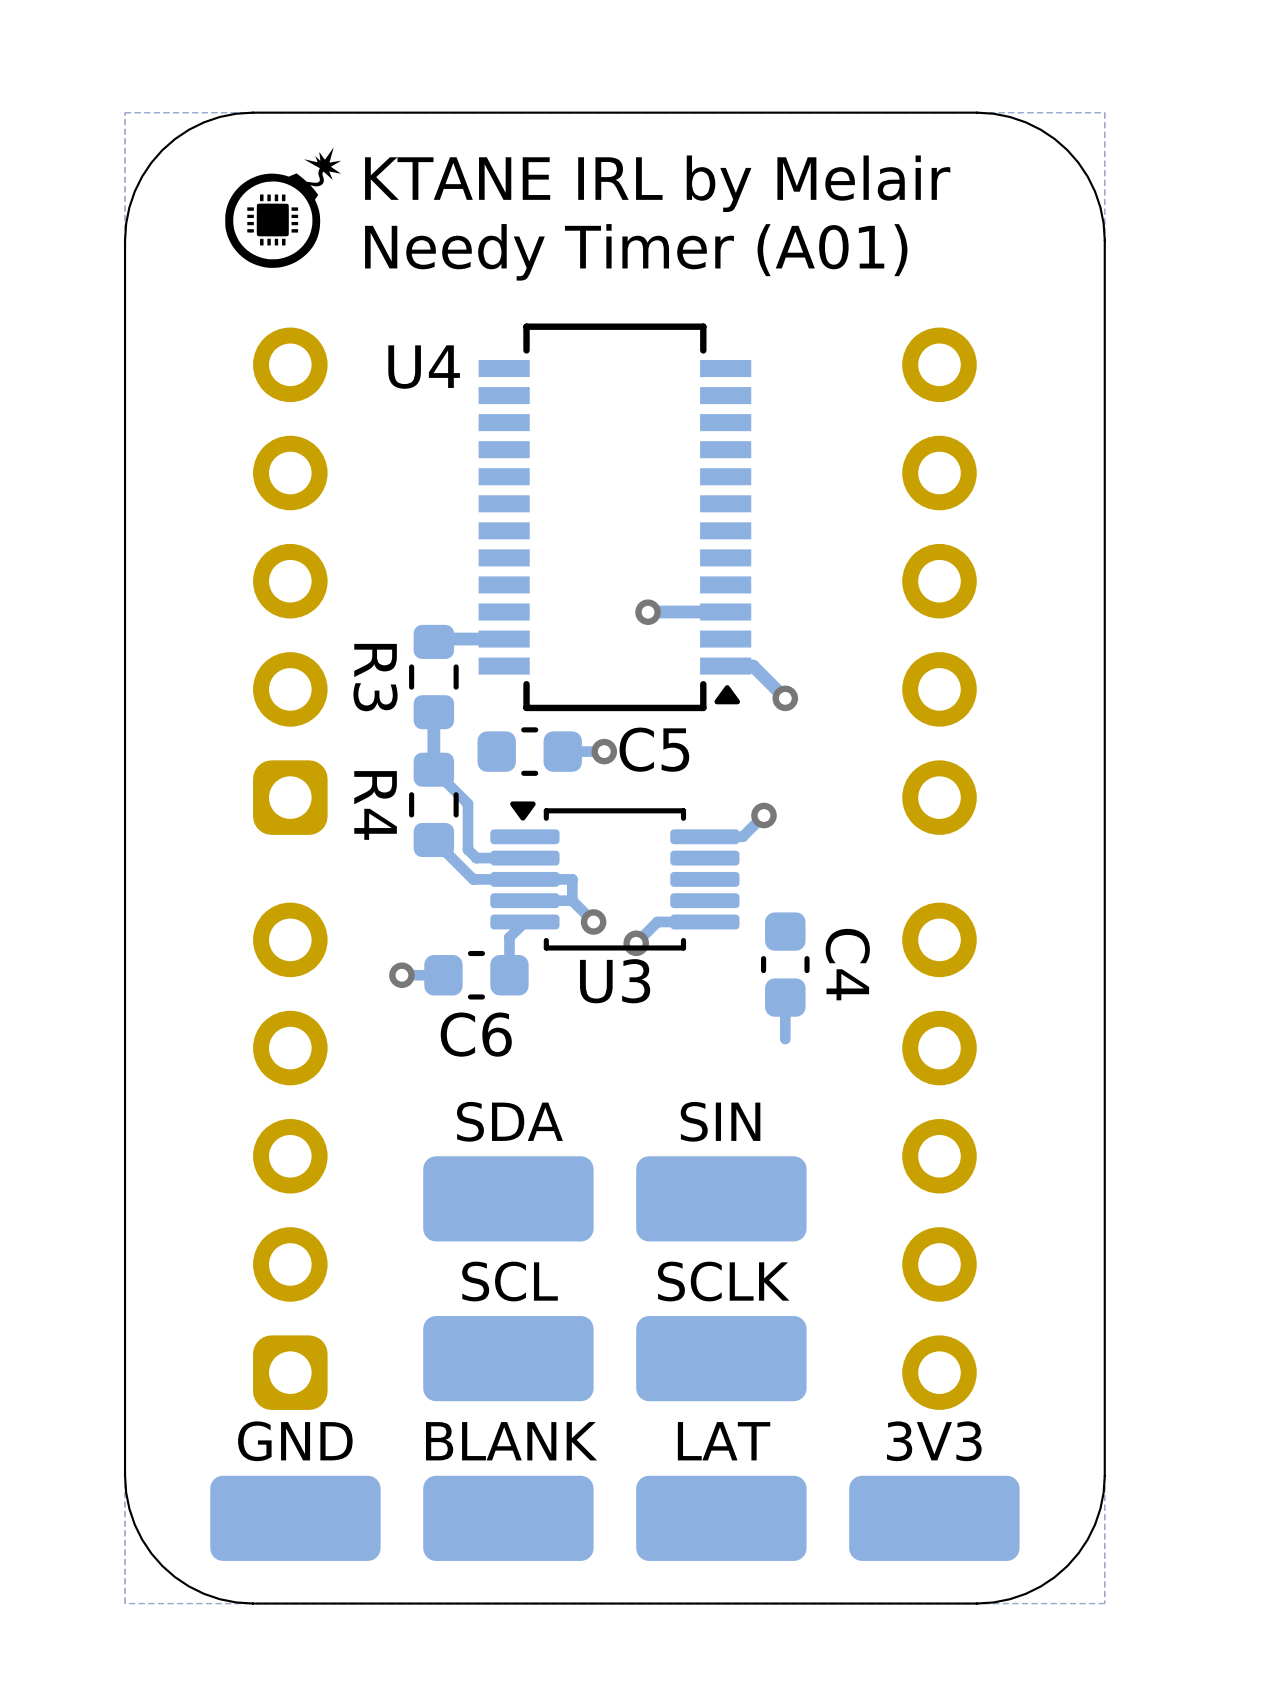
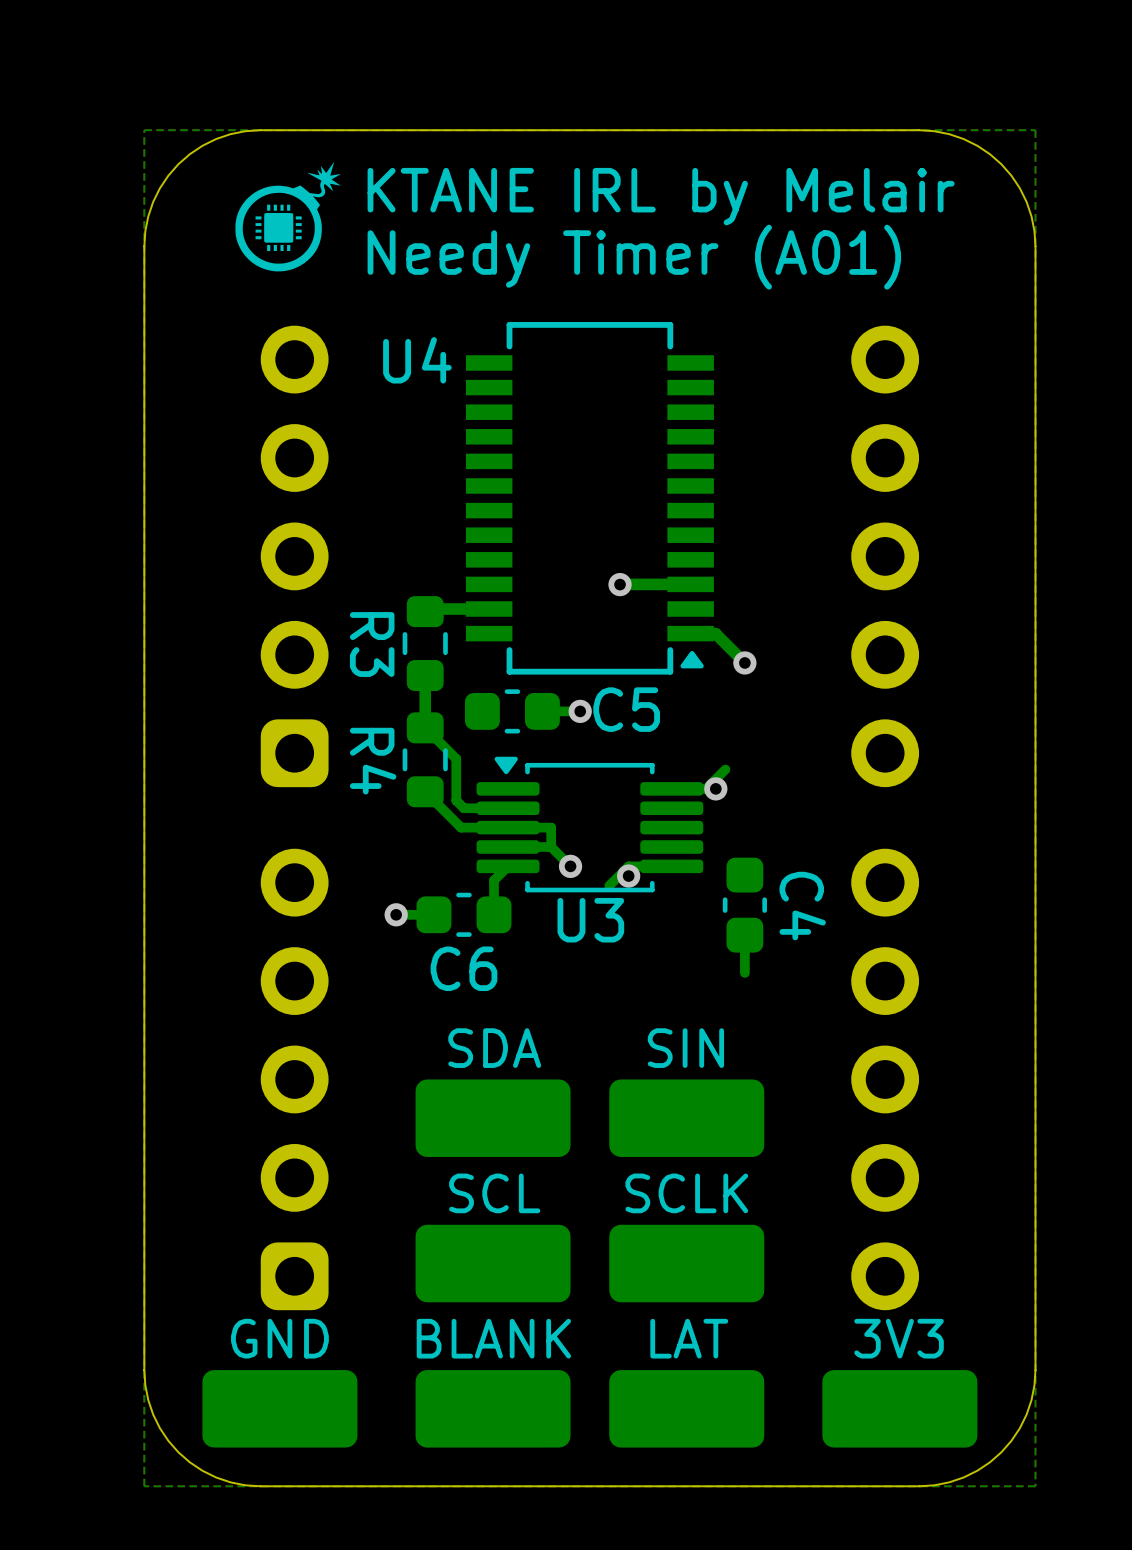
via position: (763, 815) -> (715, 788)
via position: (636, 943) -> (628, 876)
part position: (295, 1518) -> (279, 1408)
part position: (934, 1518) -> (899, 1408)

